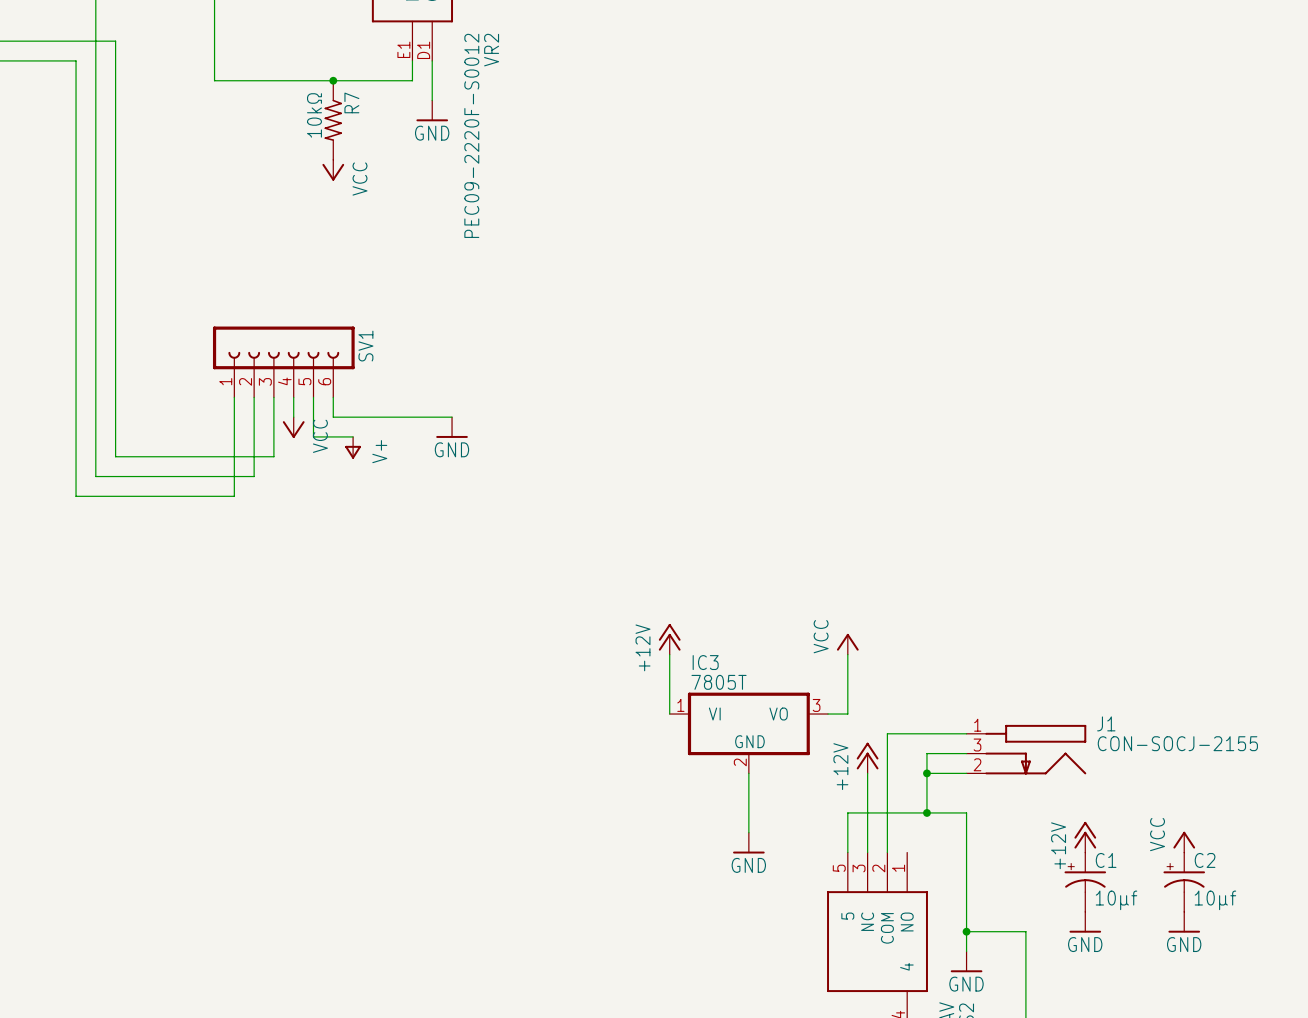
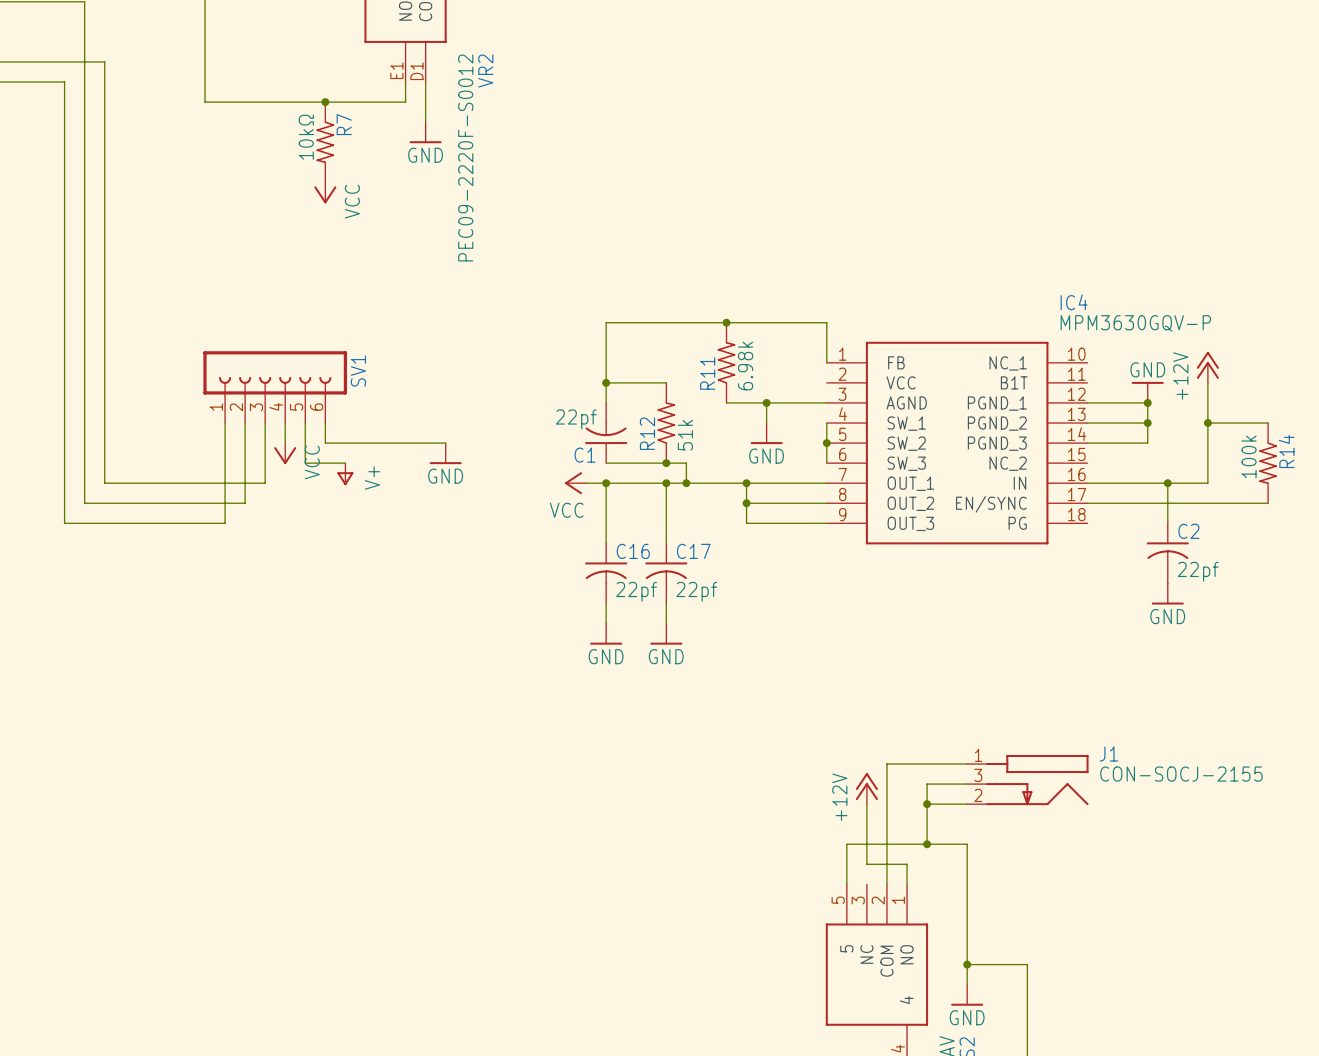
junction: none -> (726, 322)
R11: none -> 6.98k (726, 362)
wire: none -> (826, 362) (826, 322) (606, 322) (606, 402)
power symbol: none -> +12V (1207, 367)
wire: none -> (606, 382) (666, 382)
junction: none -> (606, 382)
wire: none -> (1207, 382) (1207, 483) (1087, 483)
power symbol: none -> GND (1147, 392)
wire: none -> (726, 402) (826, 402)
wire: none -> (766, 402) (766, 423)
junction: none -> (766, 402)
wire: none -> (1087, 402) (1147, 402) (1147, 443) (1087, 443)
junction: none -> (1147, 402)
R12: none -> 51k (666, 423)
wire: none -> (826, 423) (826, 463)
wire: none -> (1087, 423) (1147, 423)
junction: none -> (1147, 423)
wire: none -> (1207, 423) (1268, 423)
junction: none -> (1207, 423)
power symbol: none -> GND (766, 433)
junction: none -> (826, 443)
IC4: none -> MPM3630GQV-P (957, 443)
wire: none -> (606, 463) (686, 463) (686, 483)
junction: none -> (666, 463)
R14: none -> 100k (1268, 463)
power symbol: none -> VCC (575, 483)
wire: none -> (586, 483) (826, 483)
wire: none -> (606, 483) (606, 543)
junction: none -> (606, 483)
wire: none -> (666, 483) (666, 543)
junction: none -> (666, 483)
junction: none -> (686, 483)
wire: none -> (746, 483) (746, 523) (826, 523)
junction: none -> (746, 483)
wire: none -> (1167, 483) (1167, 523)
junction: none -> (1167, 483)
wire: none -> (746, 503) (826, 503)
junction: none -> (746, 503)
wire: none -> (1087, 503) (1268, 503)
C16: none -> 22pf (606, 573)
C17: none -> 22pf (666, 573)
power symbol: none -> GND (1167, 594)
wire: none -> (606, 603) (606, 623)
wire: none -> (666, 603) (666, 623)
power symbol: none -> GND (606, 634)
power symbol: none -> GND (666, 634)
power symbol: +12V (669, 639) -> none
power symbol: VCC (847, 644) -> none
wire: (669, 654) (669, 714) -> none
wire: (847, 654) (847, 714) (828, 714) -> none
IC3: 7805T (748, 733) -> none
wire: (748, 773) (748, 832) -> none
wire: (867, 832) (867, 852) -> (866, 864) (907, 864) (907, 884)
power symbol: +12V (1085, 837) -> none
power symbol: VCC (1184, 842) -> none
power symbol: GND (748, 843) -> none
C1 symbol: [1064, 852, 1107, 912] -> [585, 402, 628, 464]
C2 symbol: [1163, 852, 1206, 912] -> [1146, 523, 1189, 584]
C1 name position: C1 (1106, 860) -> C1 (585, 455)
C1 value: 10μf (1116, 900) -> 22pf (576, 419)
C2 value: 10μf (1215, 900) -> 22pf (1198, 571)
power symbol: GND (1085, 922) -> none
power symbol: GND (1184, 922) -> none

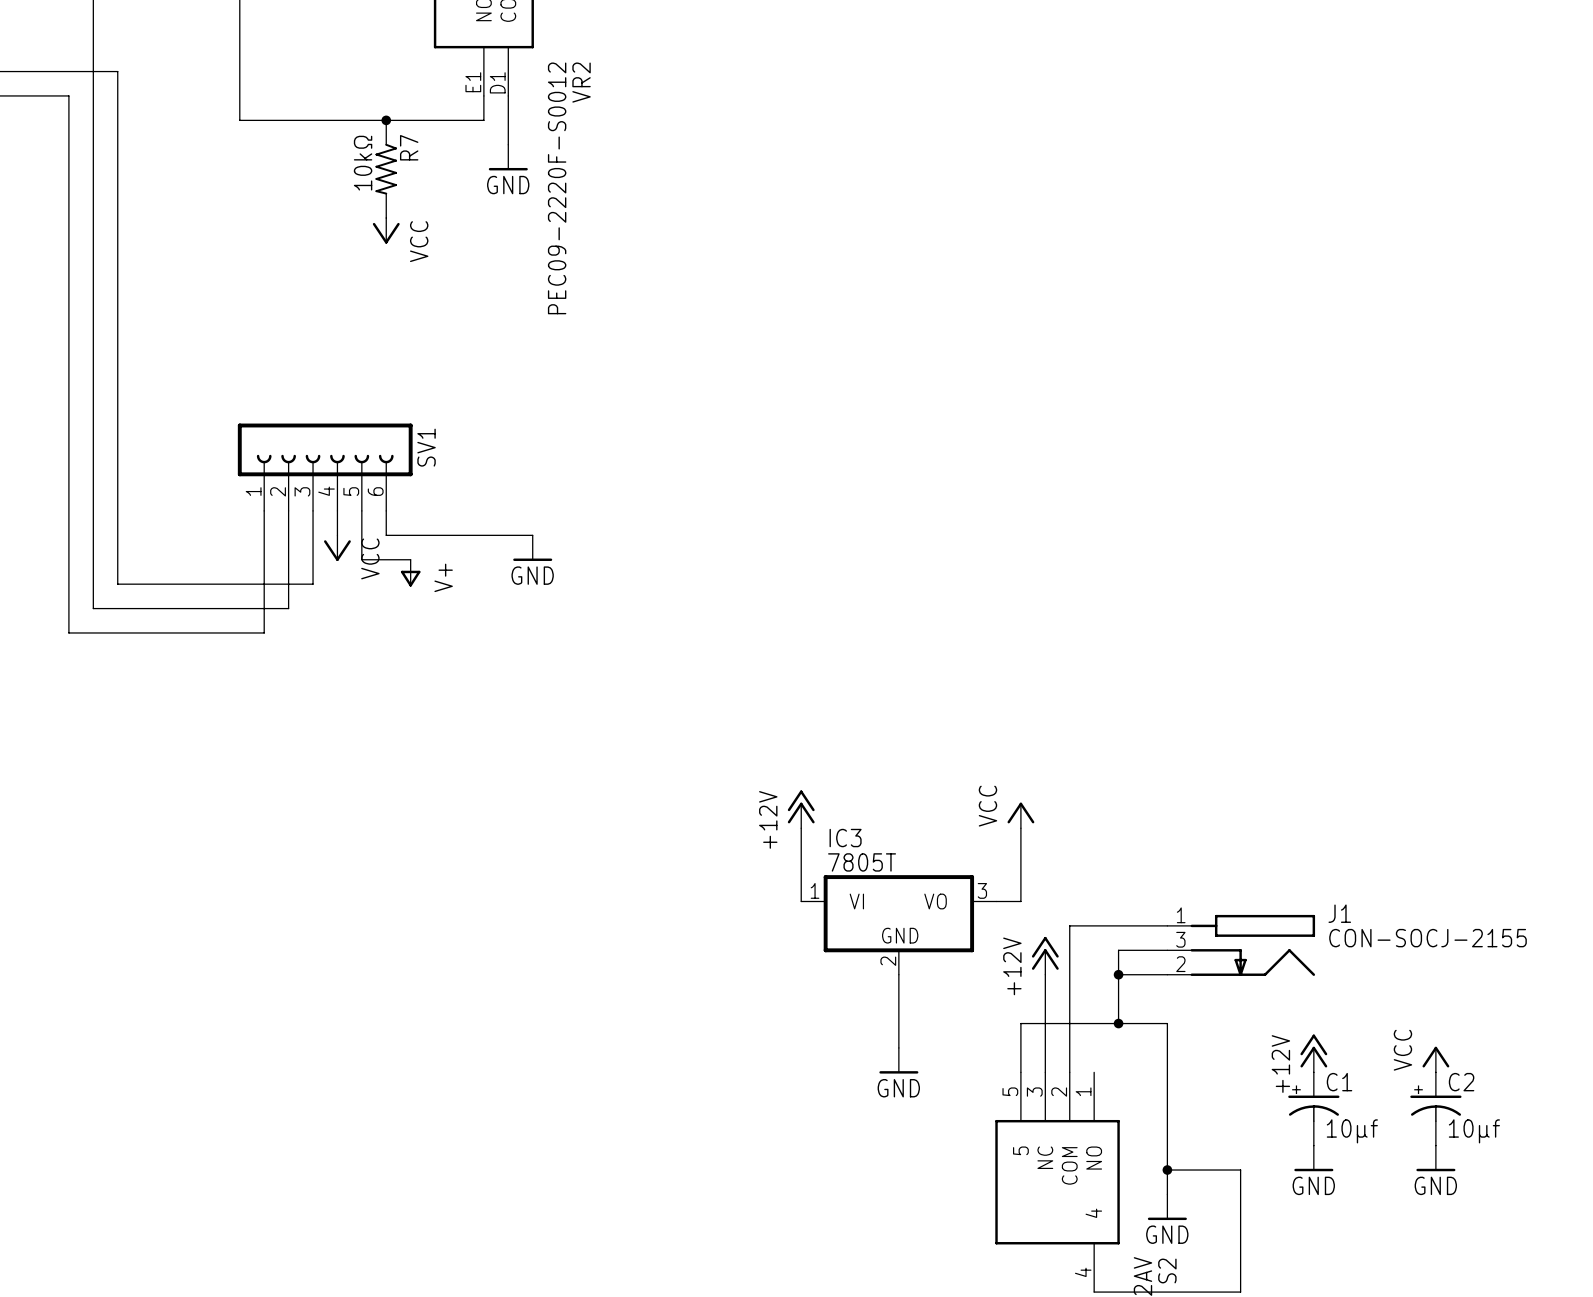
junction: (726, 322) -> none
R11: 6.98k (726, 362) -> none
wire: (826, 362) (826, 322) (606, 322) (606, 402) -> none
power symbol: +12V (1207, 367) -> none
wire: (606, 382) (666, 382) -> none
junction: (606, 382) -> none
wire: (1207, 382) (1207, 483) (1087, 483) -> none
power symbol: GND (1147, 392) -> none
C1 symbol: [585, 402, 628, 464] -> [1288, 1072, 1340, 1146]
wire: (726, 402) (826, 402) -> none
wire: (766, 402) (766, 423) -> none
junction: (766, 402) -> none
wire: (1087, 402) (1147, 402) (1147, 443) (1087, 443) -> none
junction: (1147, 402) -> none
C1 value: 22pf (576, 419) -> 10μf (1352, 1131)
R12: 51k (666, 423) -> none
wire: (826, 423) (826, 463) -> none
wire: (1087, 423) (1147, 423) -> none
junction: (1147, 423) -> none
wire: (1207, 423) (1268, 423) -> none
junction: (1207, 423) -> none
power symbol: GND (766, 433) -> none
junction: (826, 443) -> none
IC4: MPM3630GQV-P (957, 443) -> none
C1 name position: C1 (585, 455) -> C1 (1339, 1082)
wire: (606, 463) (686, 463) (686, 483) -> none
junction: (666, 463) -> none
R14: 100k (1268, 463) -> none
power symbol: VCC (575, 483) -> none
wire: (586, 483) (826, 483) -> none
wire: (606, 483) (606, 543) -> none
junction: (606, 483) -> none
wire: (666, 483) (666, 543) -> none
junction: (666, 483) -> none
junction: (686, 483) -> none
wire: (746, 483) (746, 523) (826, 523) -> none
junction: (746, 483) -> none
wire: (1167, 483) (1167, 523) -> none
junction: (1167, 483) -> none
wire: (746, 503) (826, 503) -> none
junction: (746, 503) -> none
wire: (1087, 503) (1268, 503) -> none
C2 symbol: [1146, 523, 1189, 584] -> [1410, 1072, 1462, 1146]
C2 value: 22pf (1198, 571) -> 10μf (1474, 1131)
C16: 22pf (606, 573) -> none
C17: 22pf (666, 573) -> none
power symbol: GND (1167, 594) -> none
wire: (606, 603) (606, 623) -> none
wire: (666, 603) (666, 623) -> none
power symbol: GND (606, 634) -> none
power symbol: GND (666, 634) -> none
power symbol: none -> +12V (801, 809)
power symbol: none -> VCC (1020, 815)
wire: none -> (801, 828) (801, 901)
wire: none -> (1020, 828) (1020, 901) (996, 901)
IC3: none -> 7805T (898, 924)
wire: none -> (898, 974) (898, 1047)
wire: (866, 864) (907, 864) (907, 884) -> (1045, 1047) (1045, 1072)
power symbol: none -> +12V (1313, 1053)
power symbol: none -> VCC (1435, 1059)
power symbol: none -> GND (898, 1060)
power symbol: none -> GND (1313, 1158)
power symbol: none -> GND (1435, 1158)

